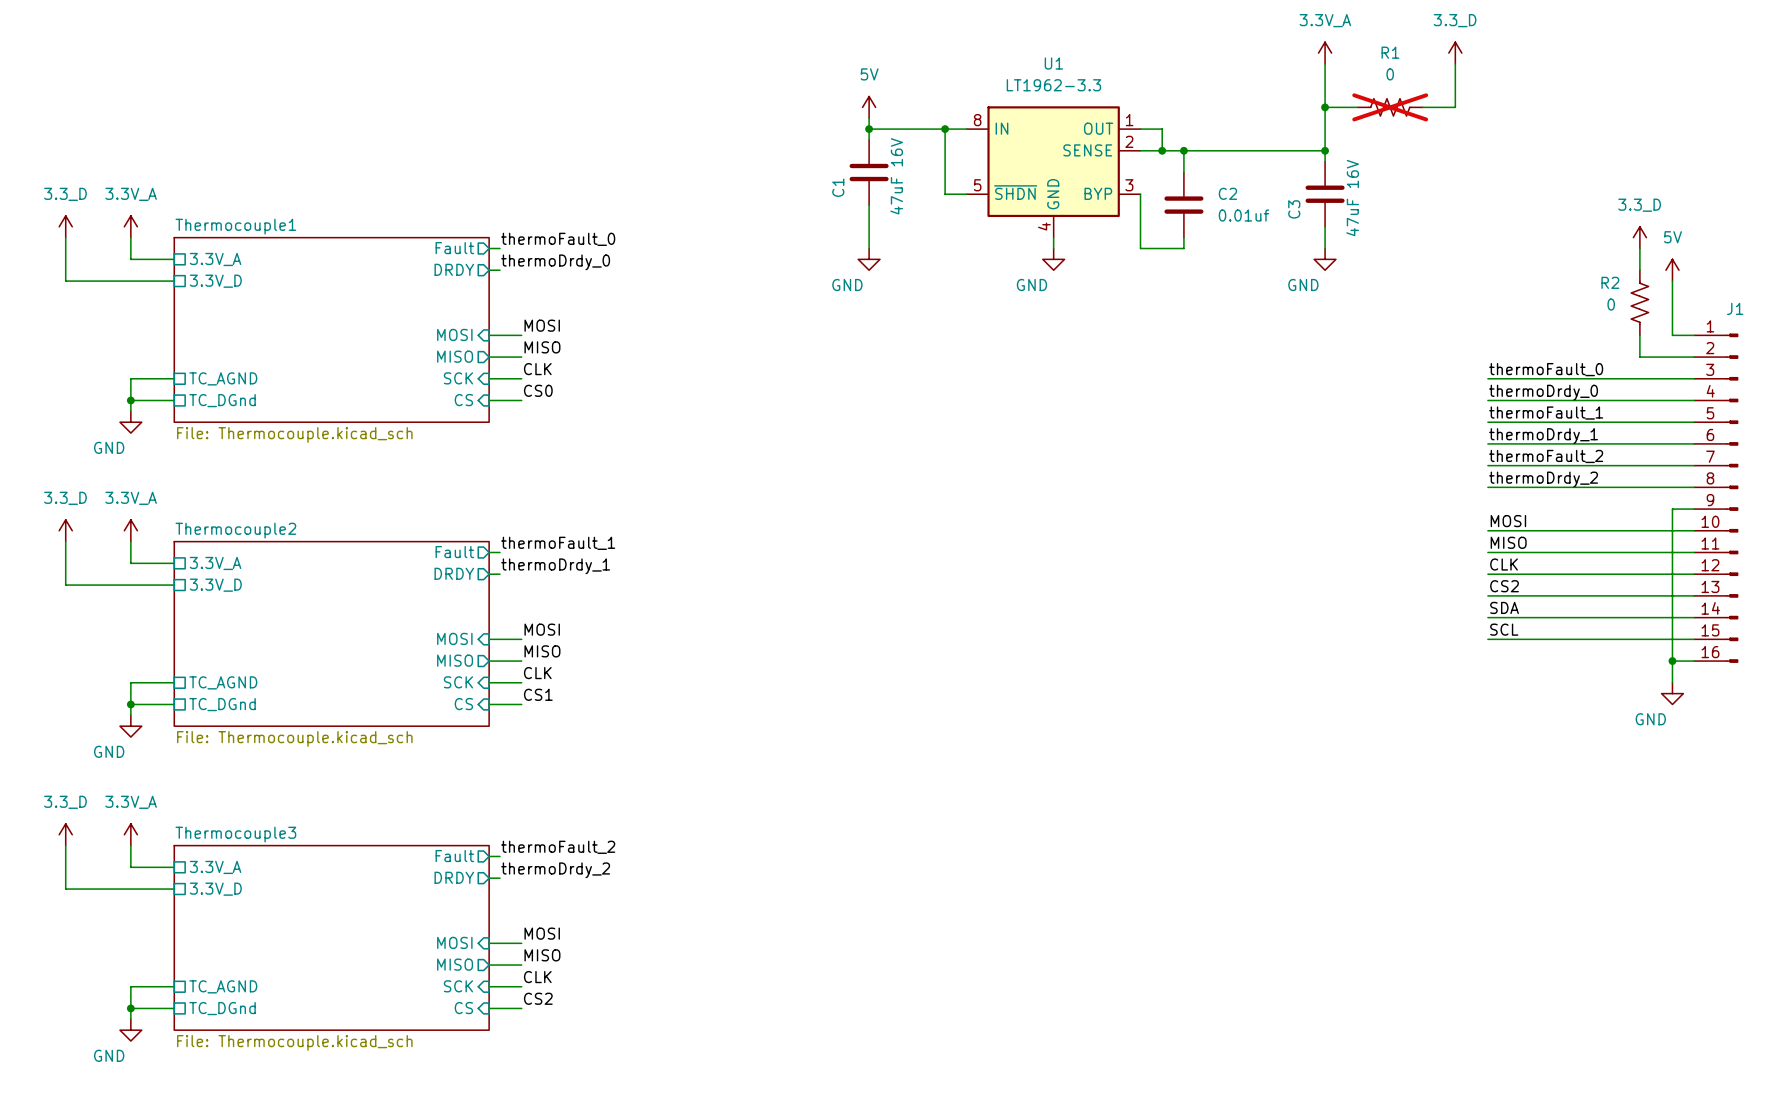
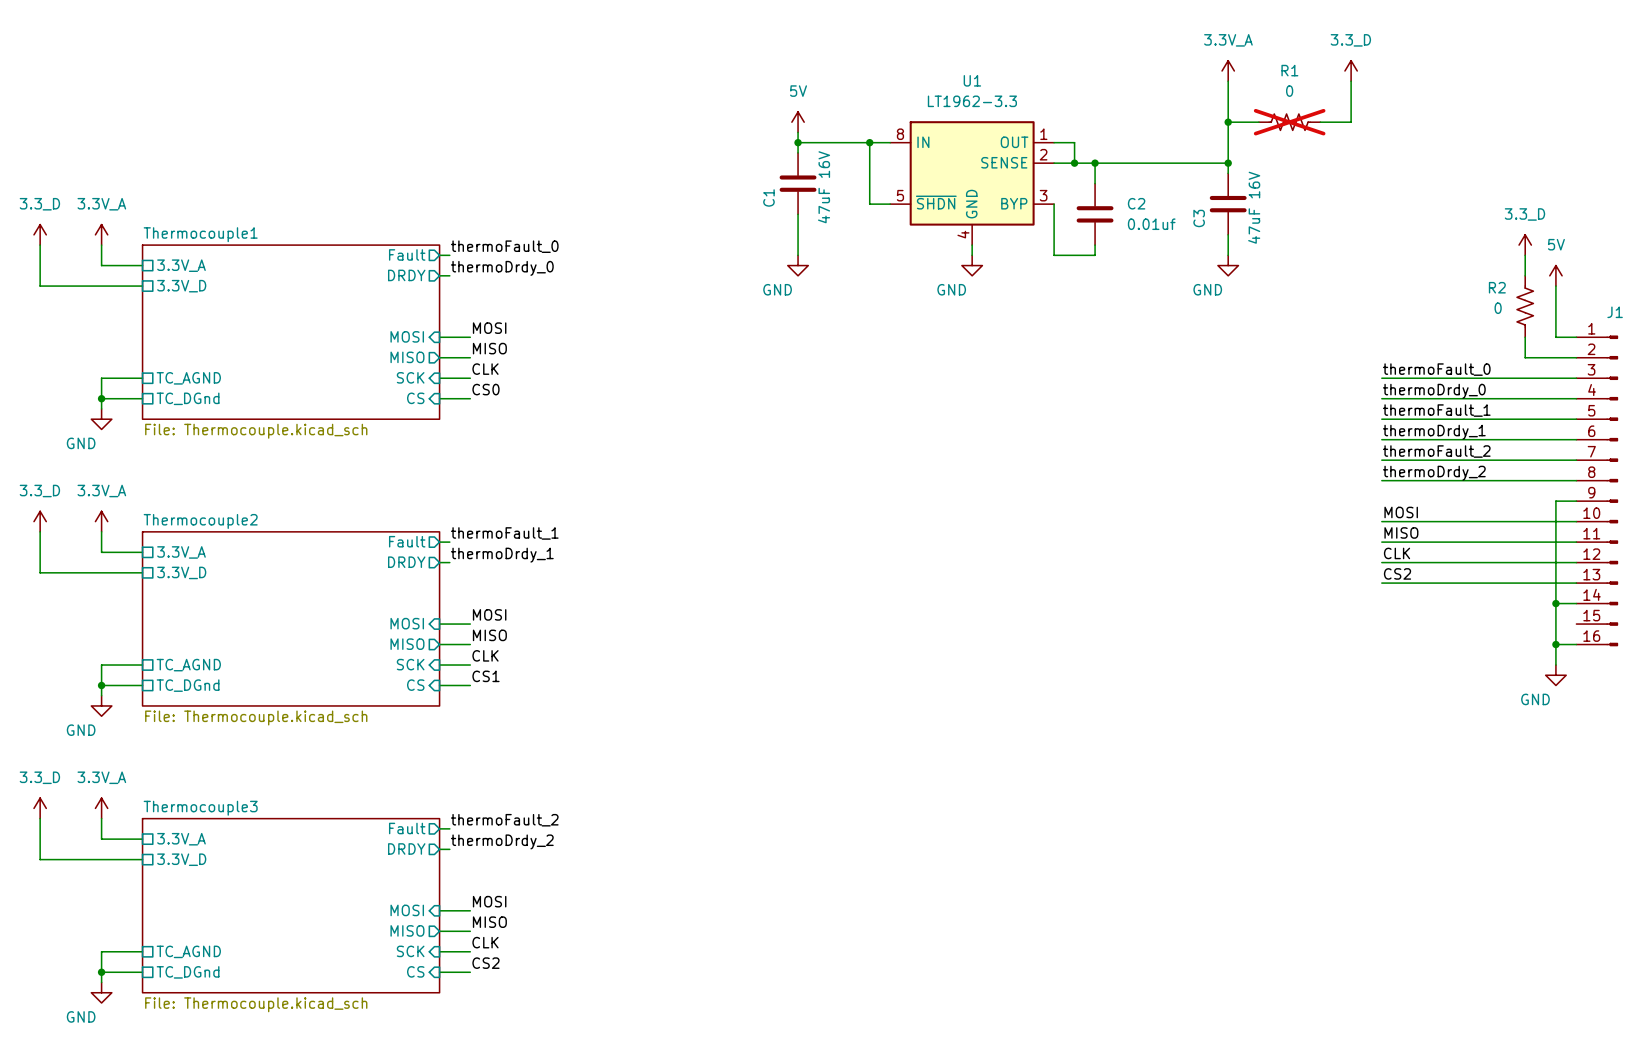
label: SDA (1504, 607) -> none
wire: (1487, 617) (1672, 617) -> none
junction: none -> (1555, 603)
label: SCL (1504, 629) -> none
wire: (1487, 639) (1694, 639) -> none

